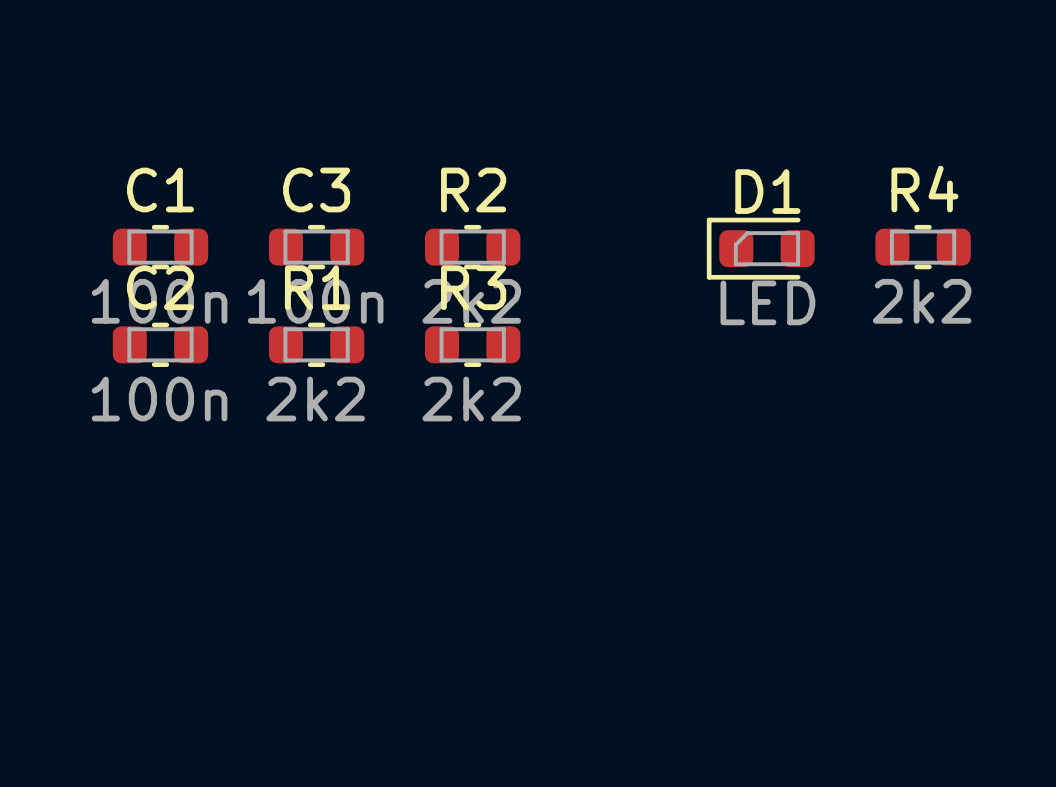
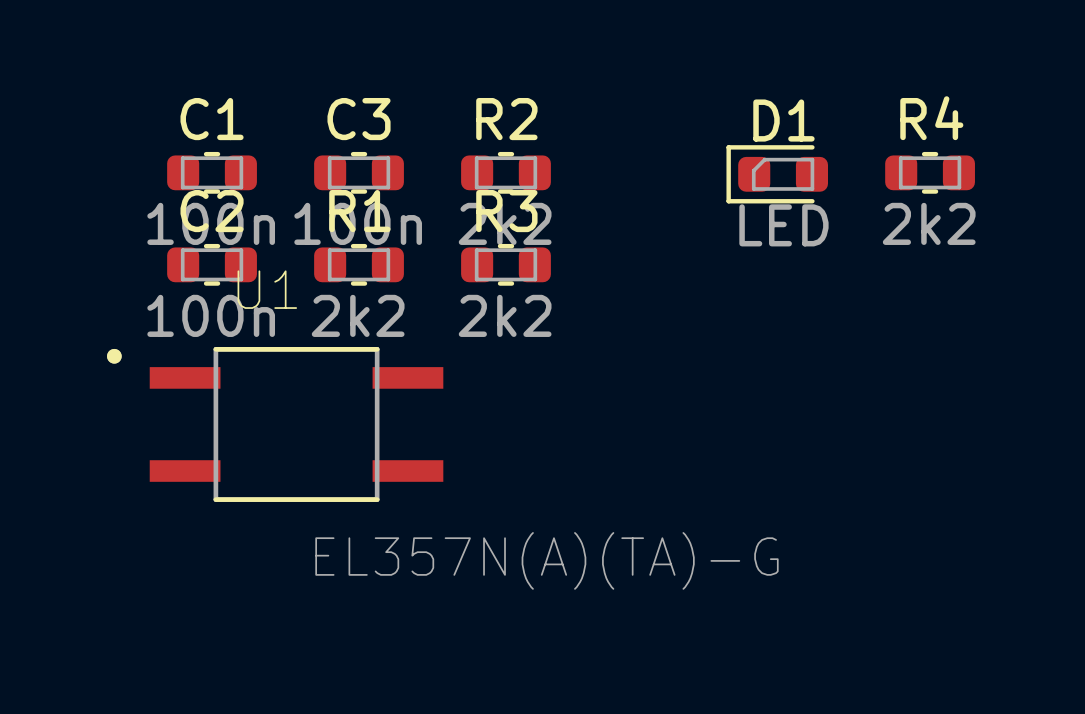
U1: none -> EL357N(A)(TA)-G (275, 424)

